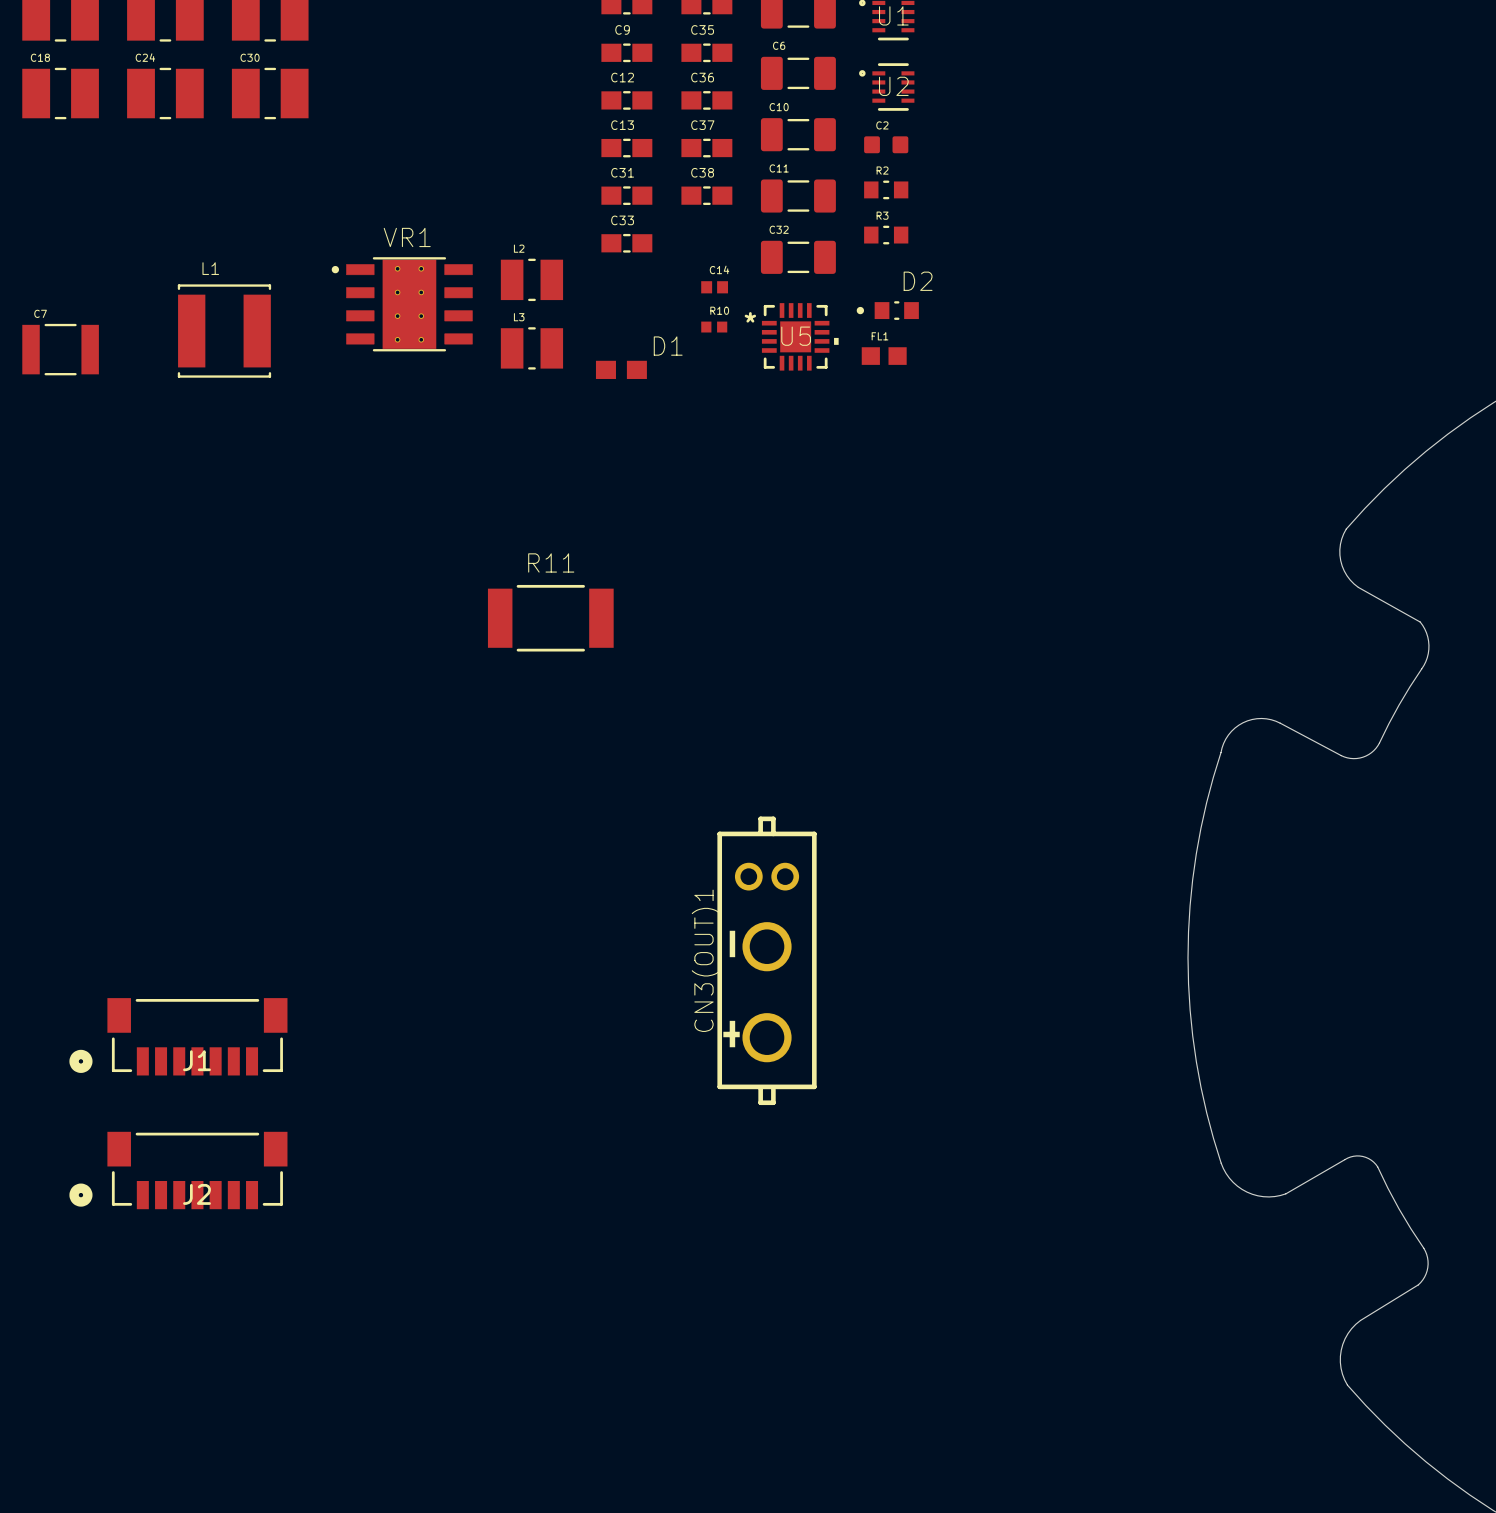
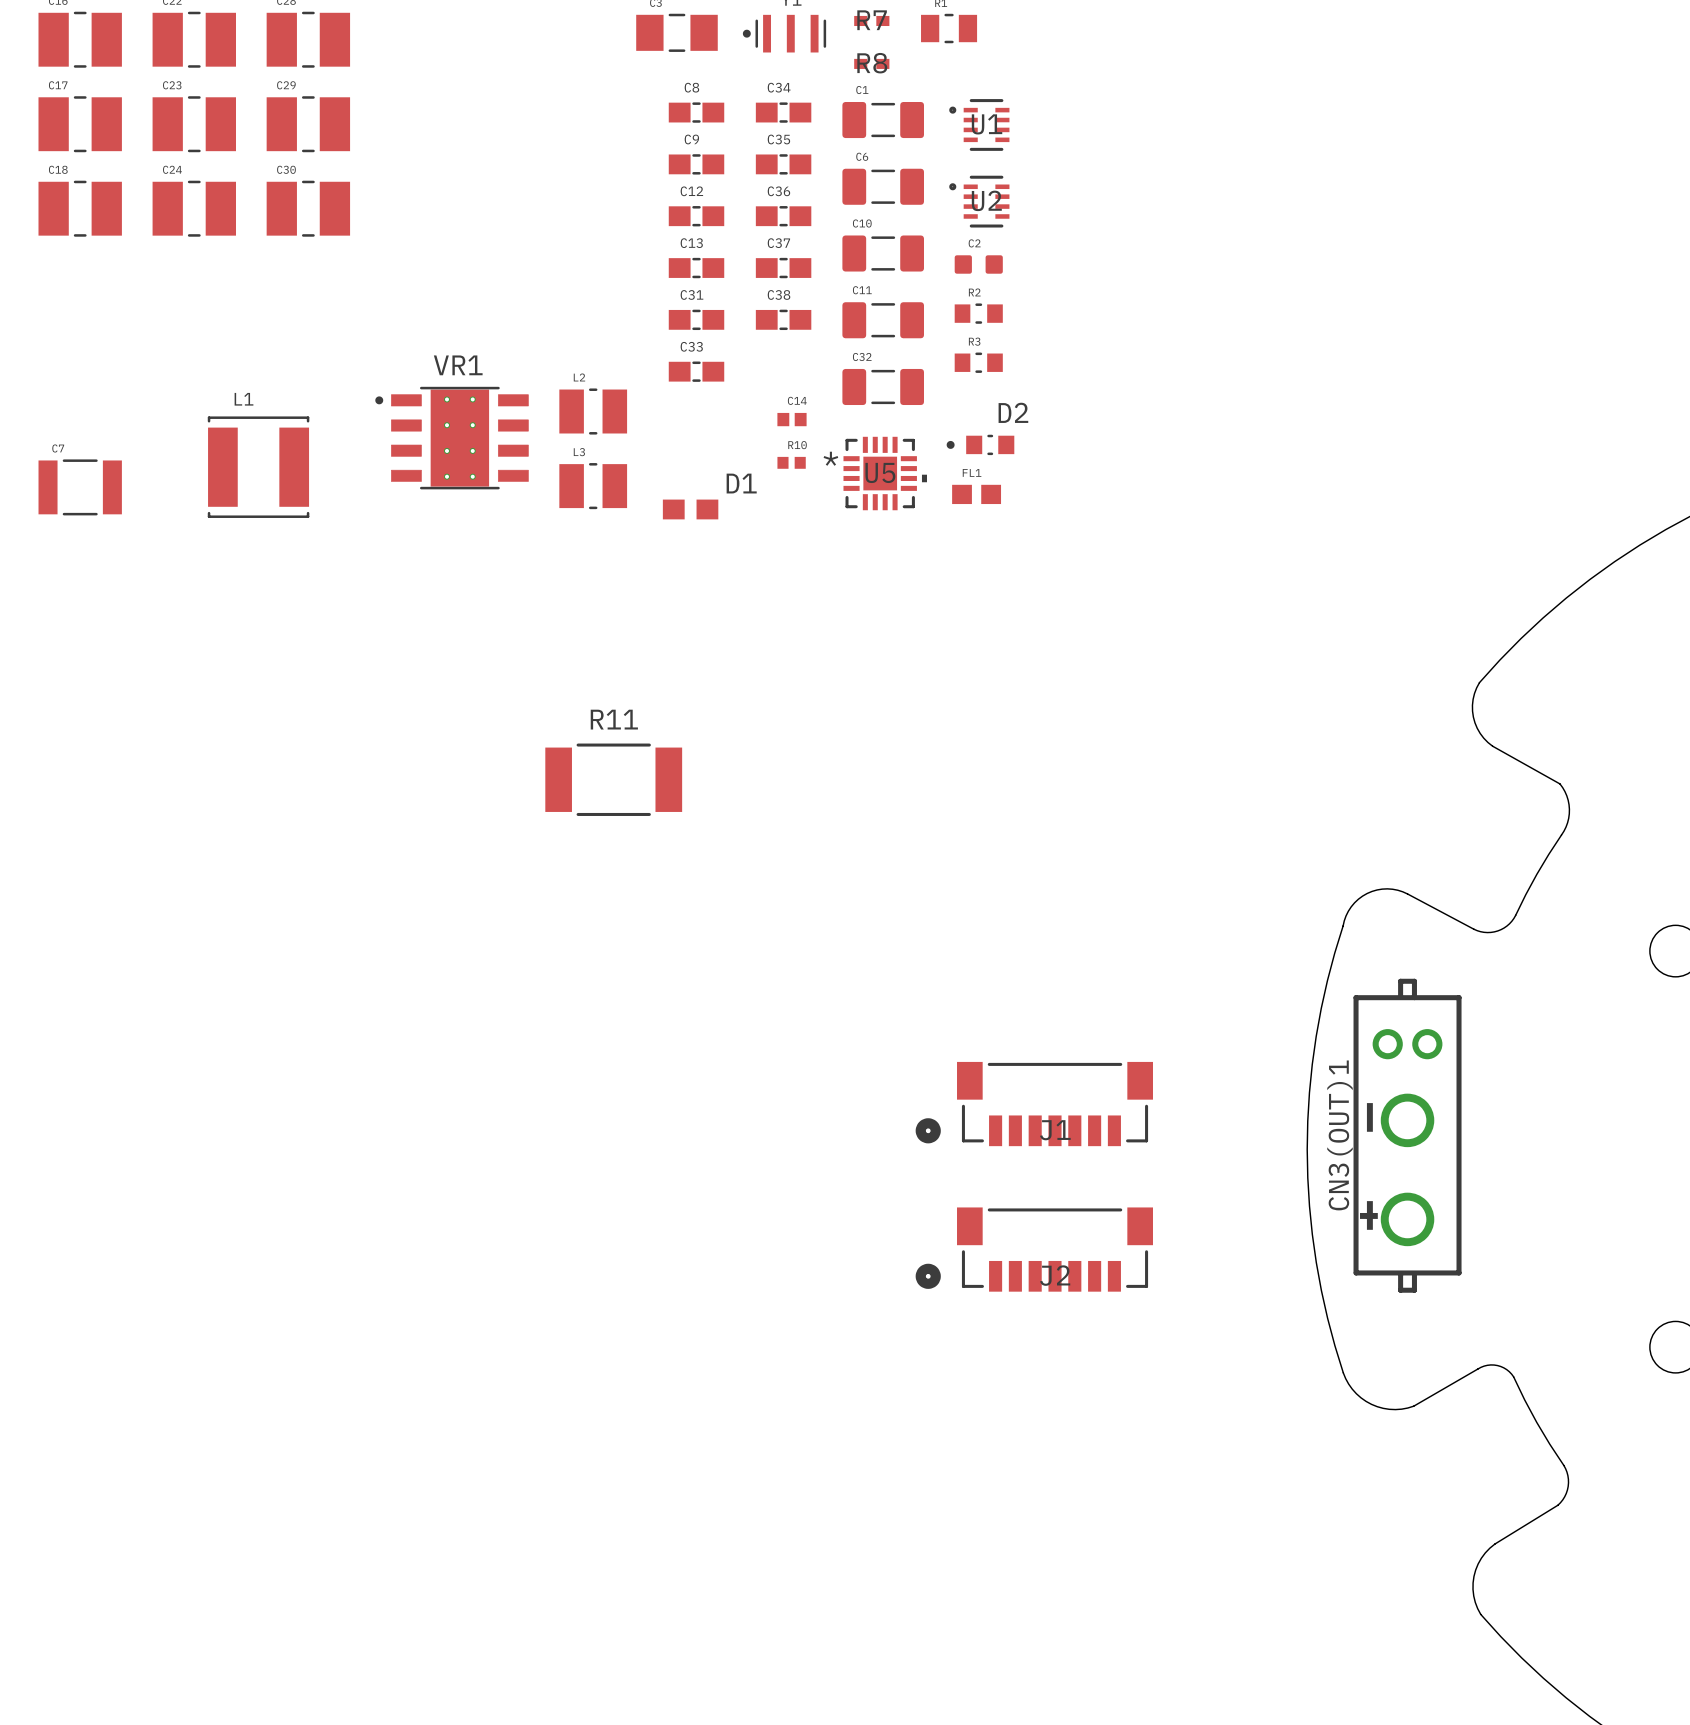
CN3(OUT)1 position: (767, 960) -> (1407, 1135)
J1 position: (178, 1036) -> (1034, 1104)
J2 position: (178, 1170) -> (1034, 1249)

